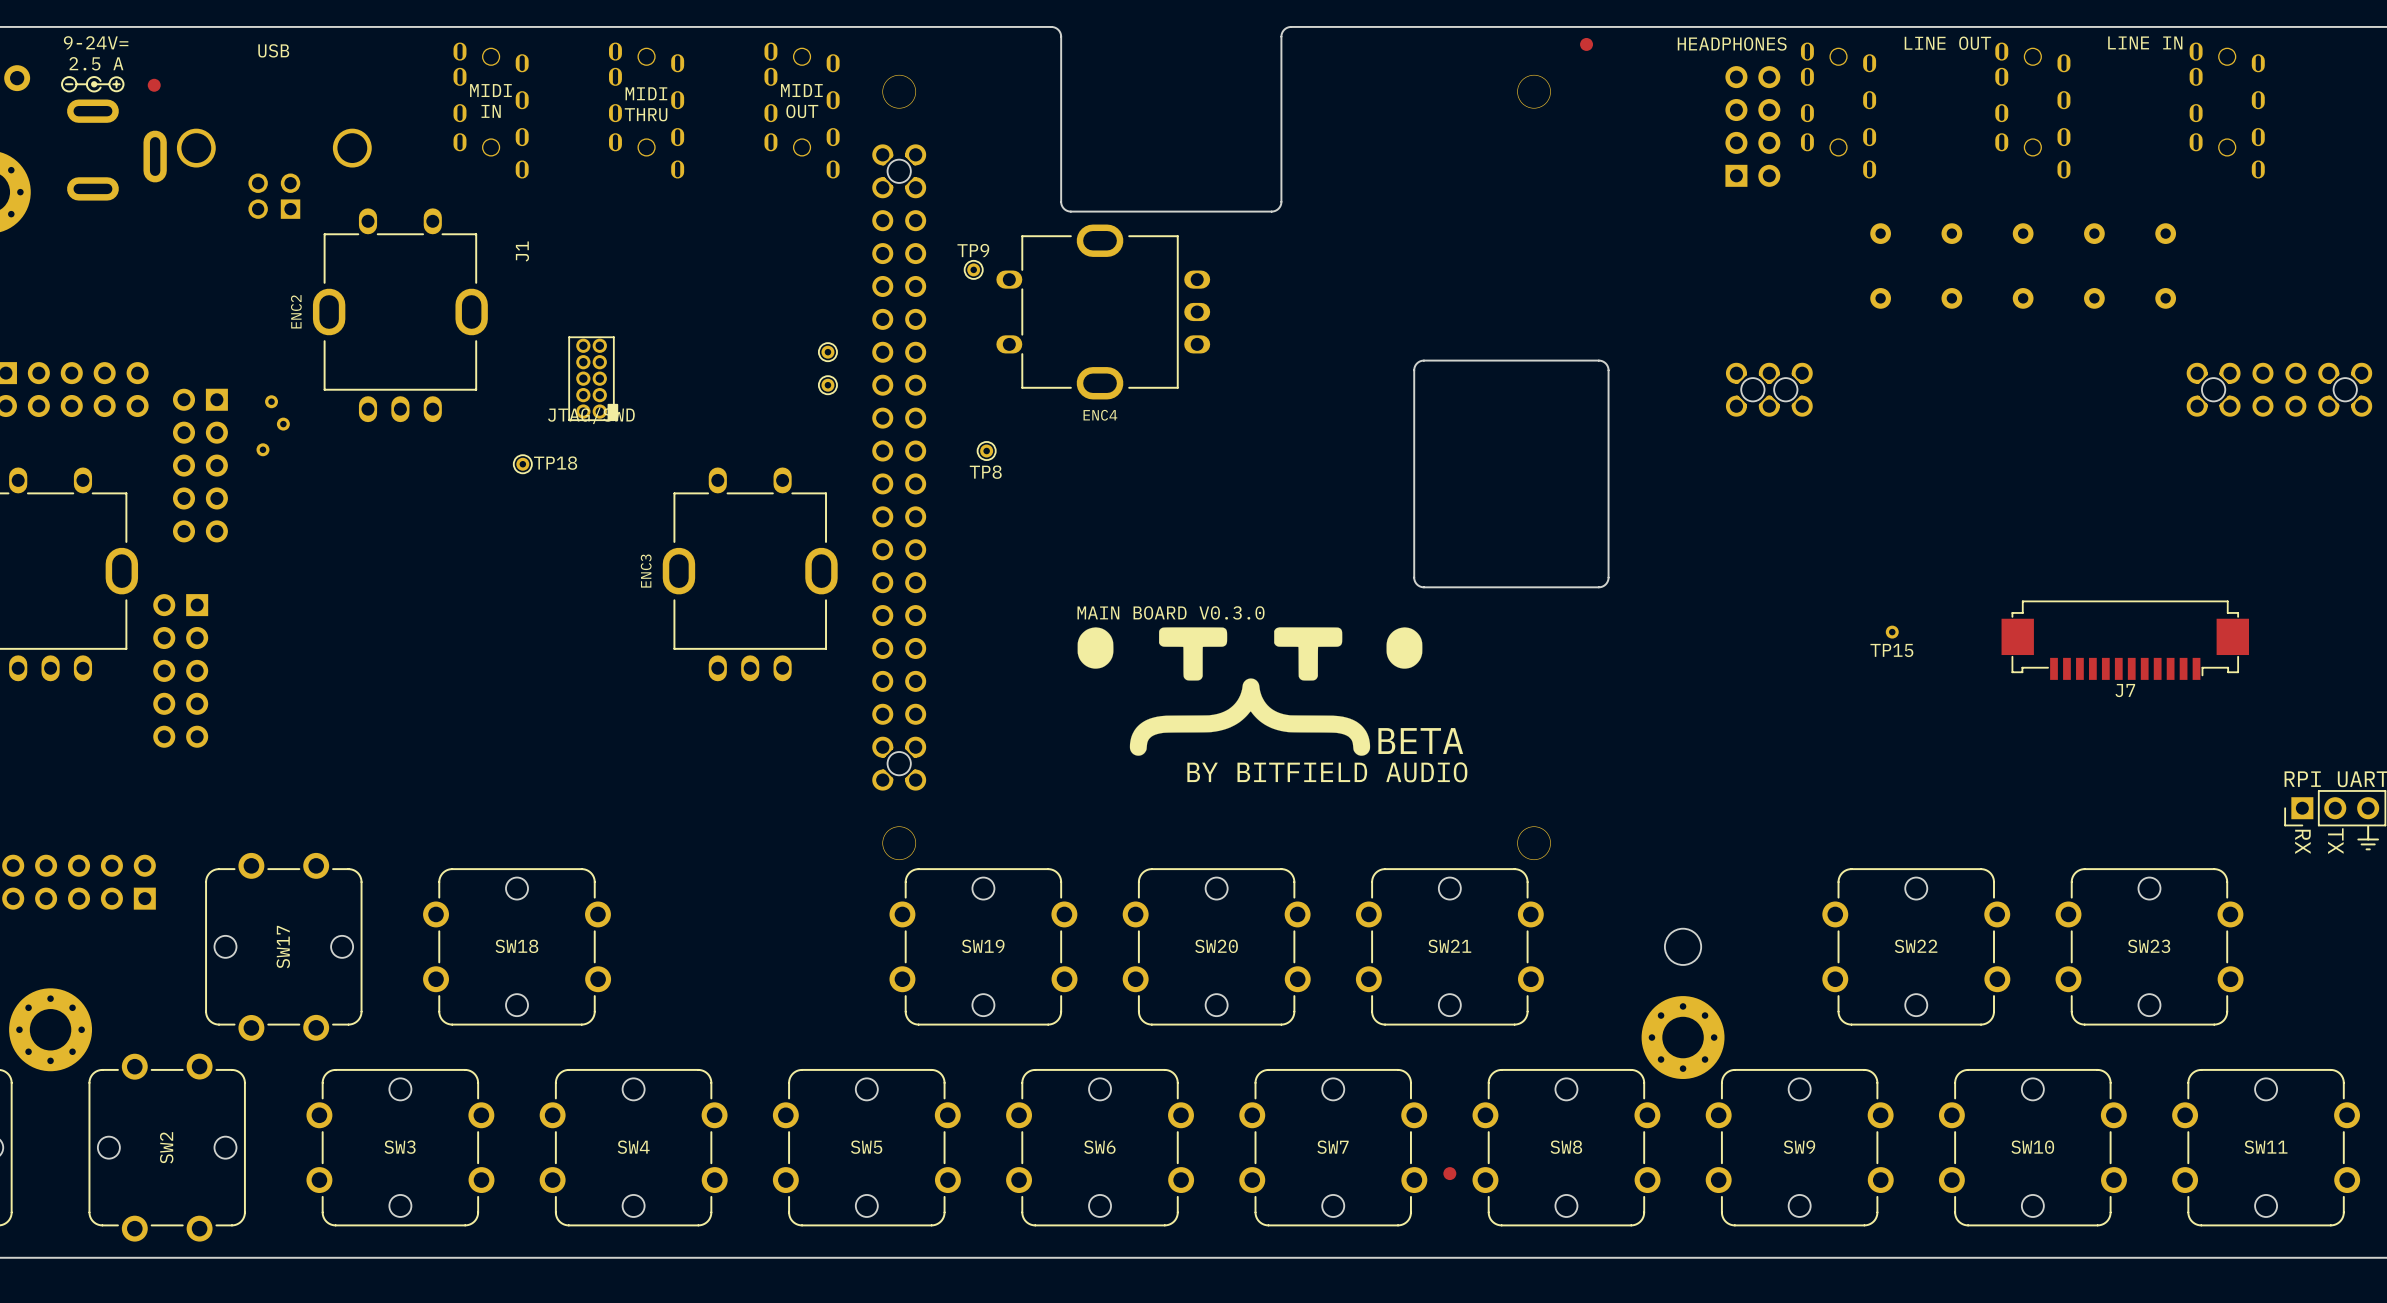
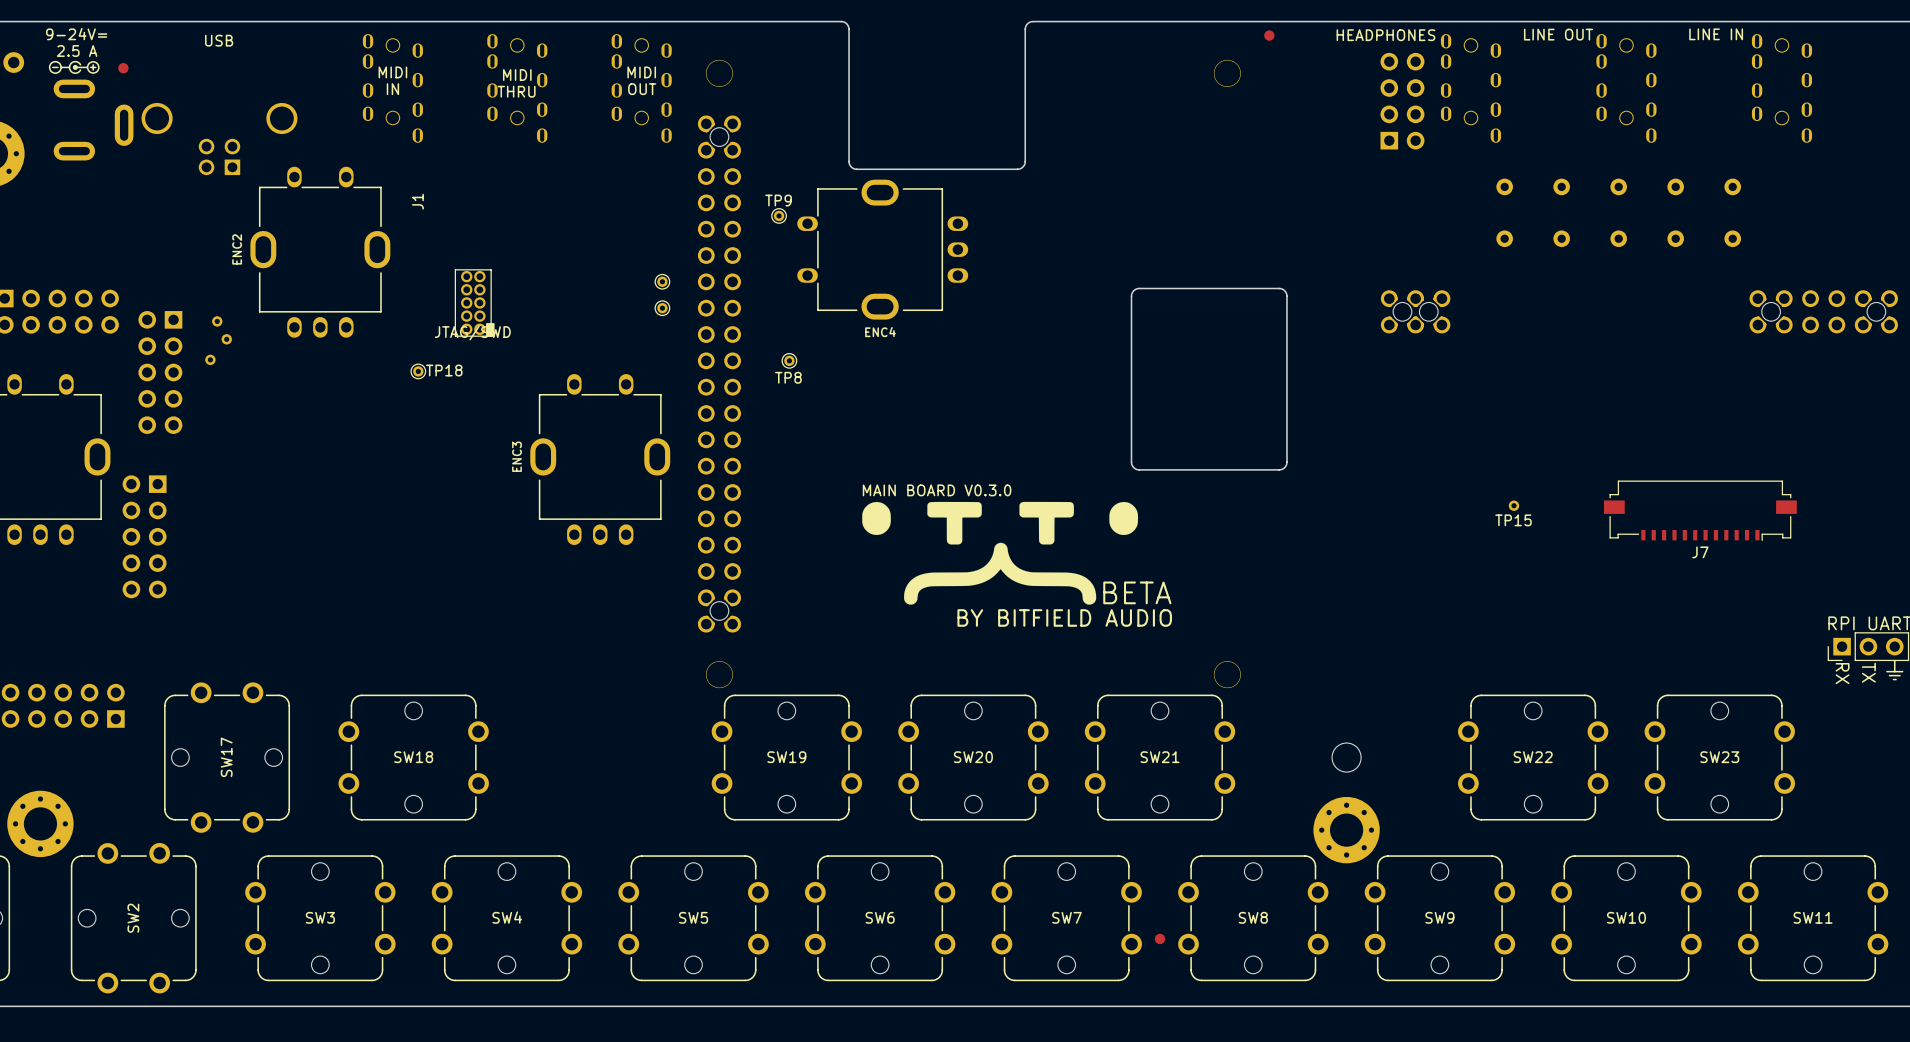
J7 footprint: [2001, 600, 2249, 680] -> [1604, 480, 1797, 541]

